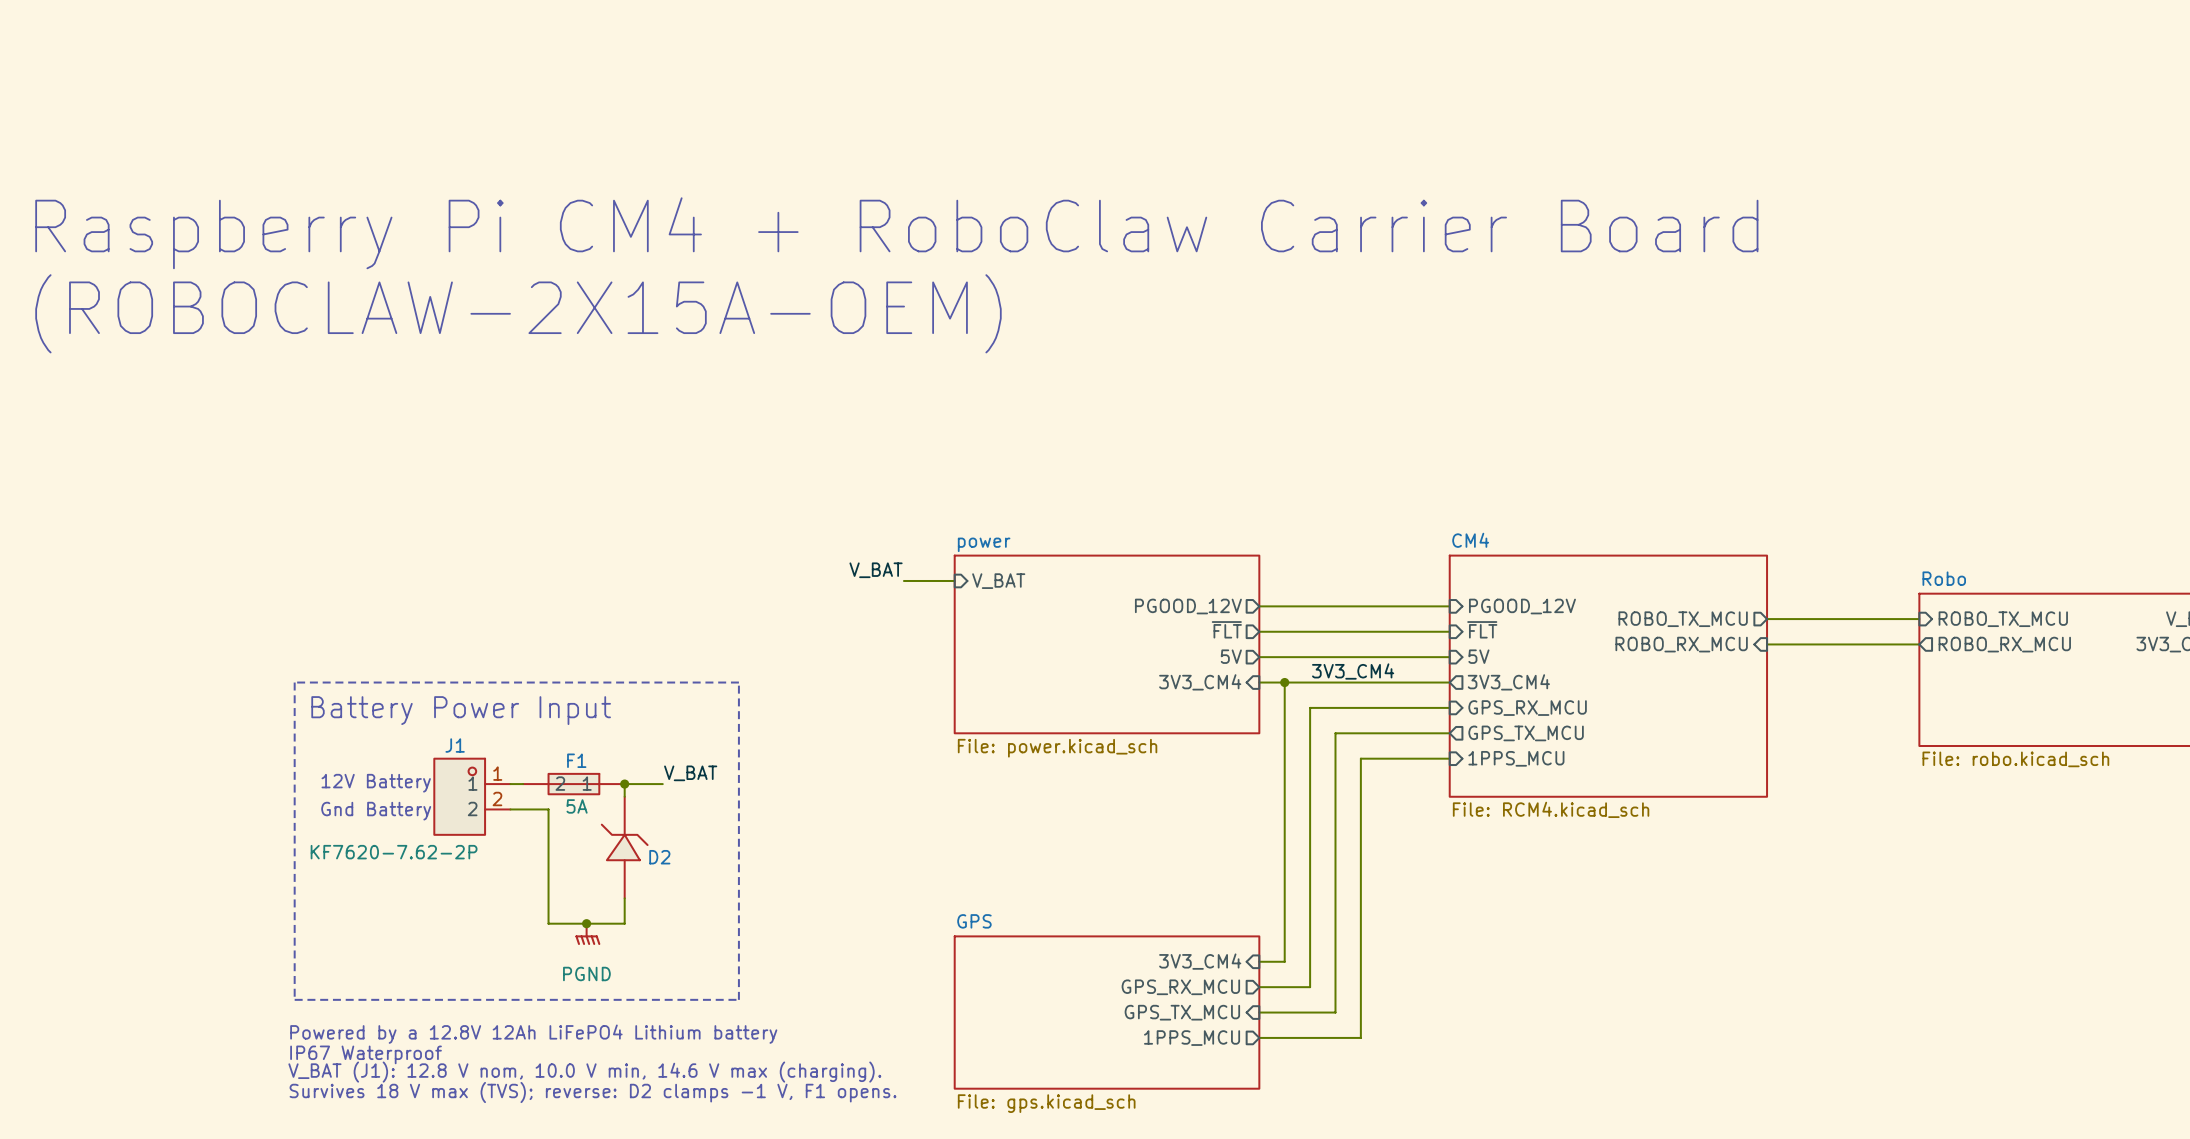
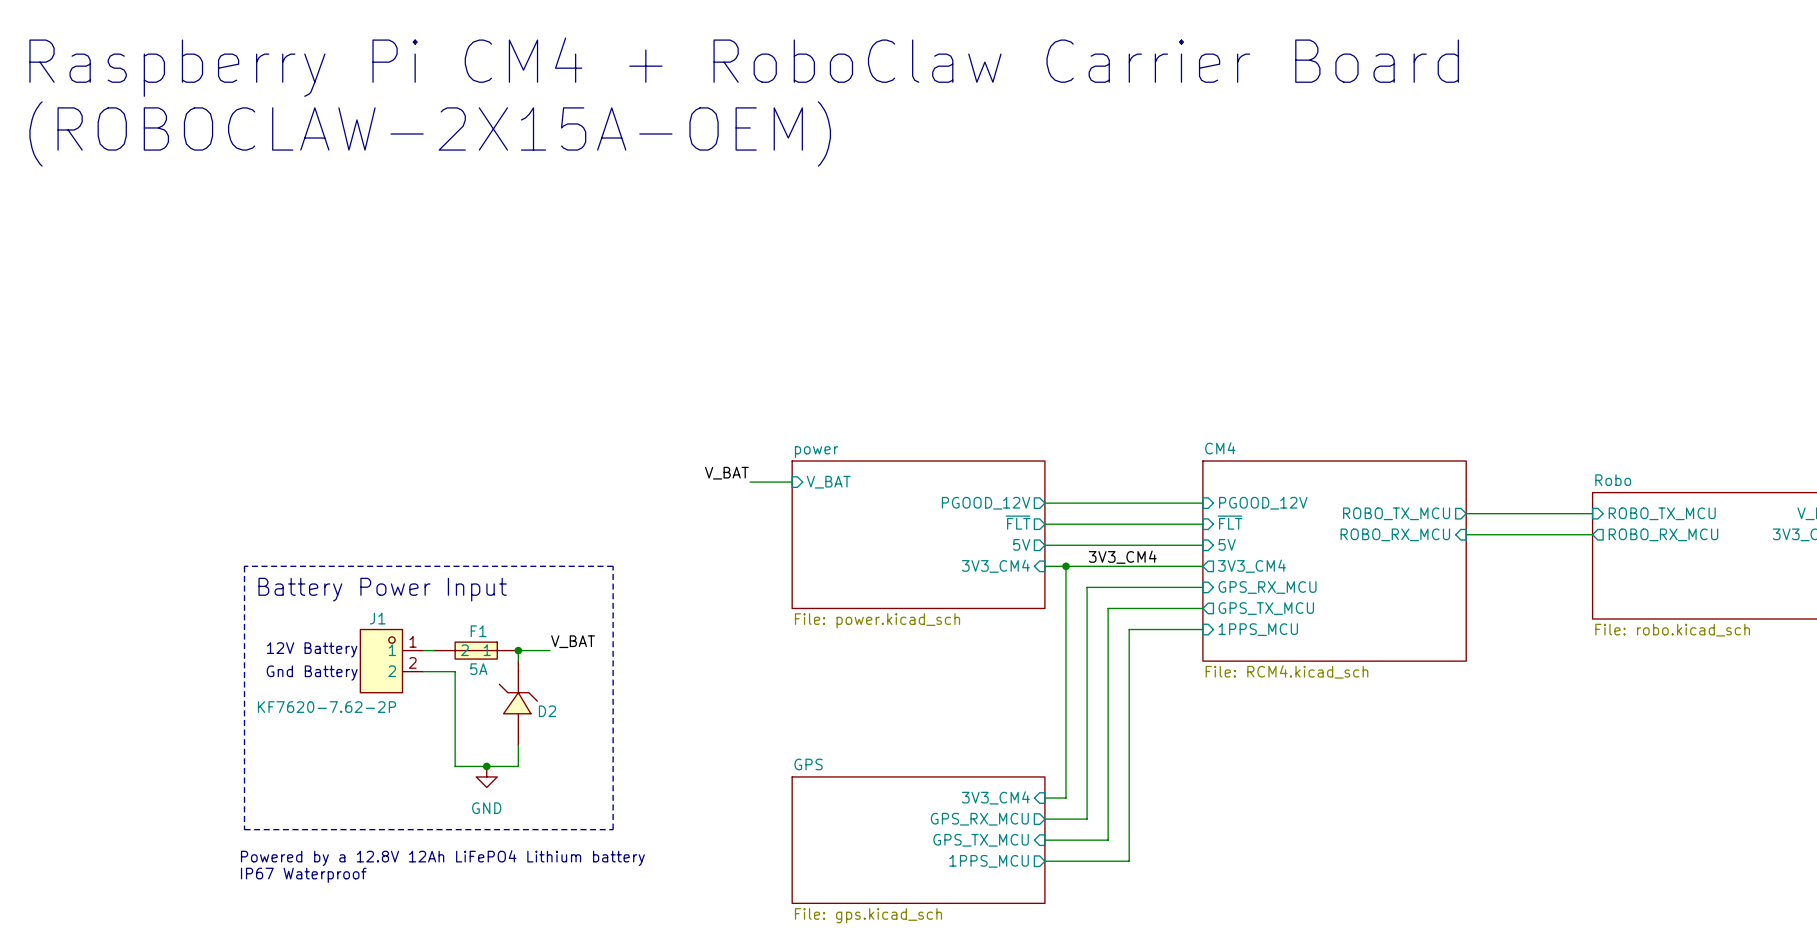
text position: Raspberry Pi CM4 + RoboClaw Carrier Board (896, 233) -> Raspberry Pi CM4 + RoboClaw Carrier Board (744, 67)
text position: (ROBOCLAW-2X15A-OEM) (518, 313) -> (ROBOCLAW-2X15A-OEM) (430, 133)
power symbol: PGND (587, 934) -> GND (486, 776)
text: V_BAT (J1): 12.8 V nom, 10.0 V min, 14.6 V max (charging). (584, 1072) -> none
text: Survives 18 V max (TVS); reverse: D2 clamps -1 V, F1 opens. (592, 1092) -> none

